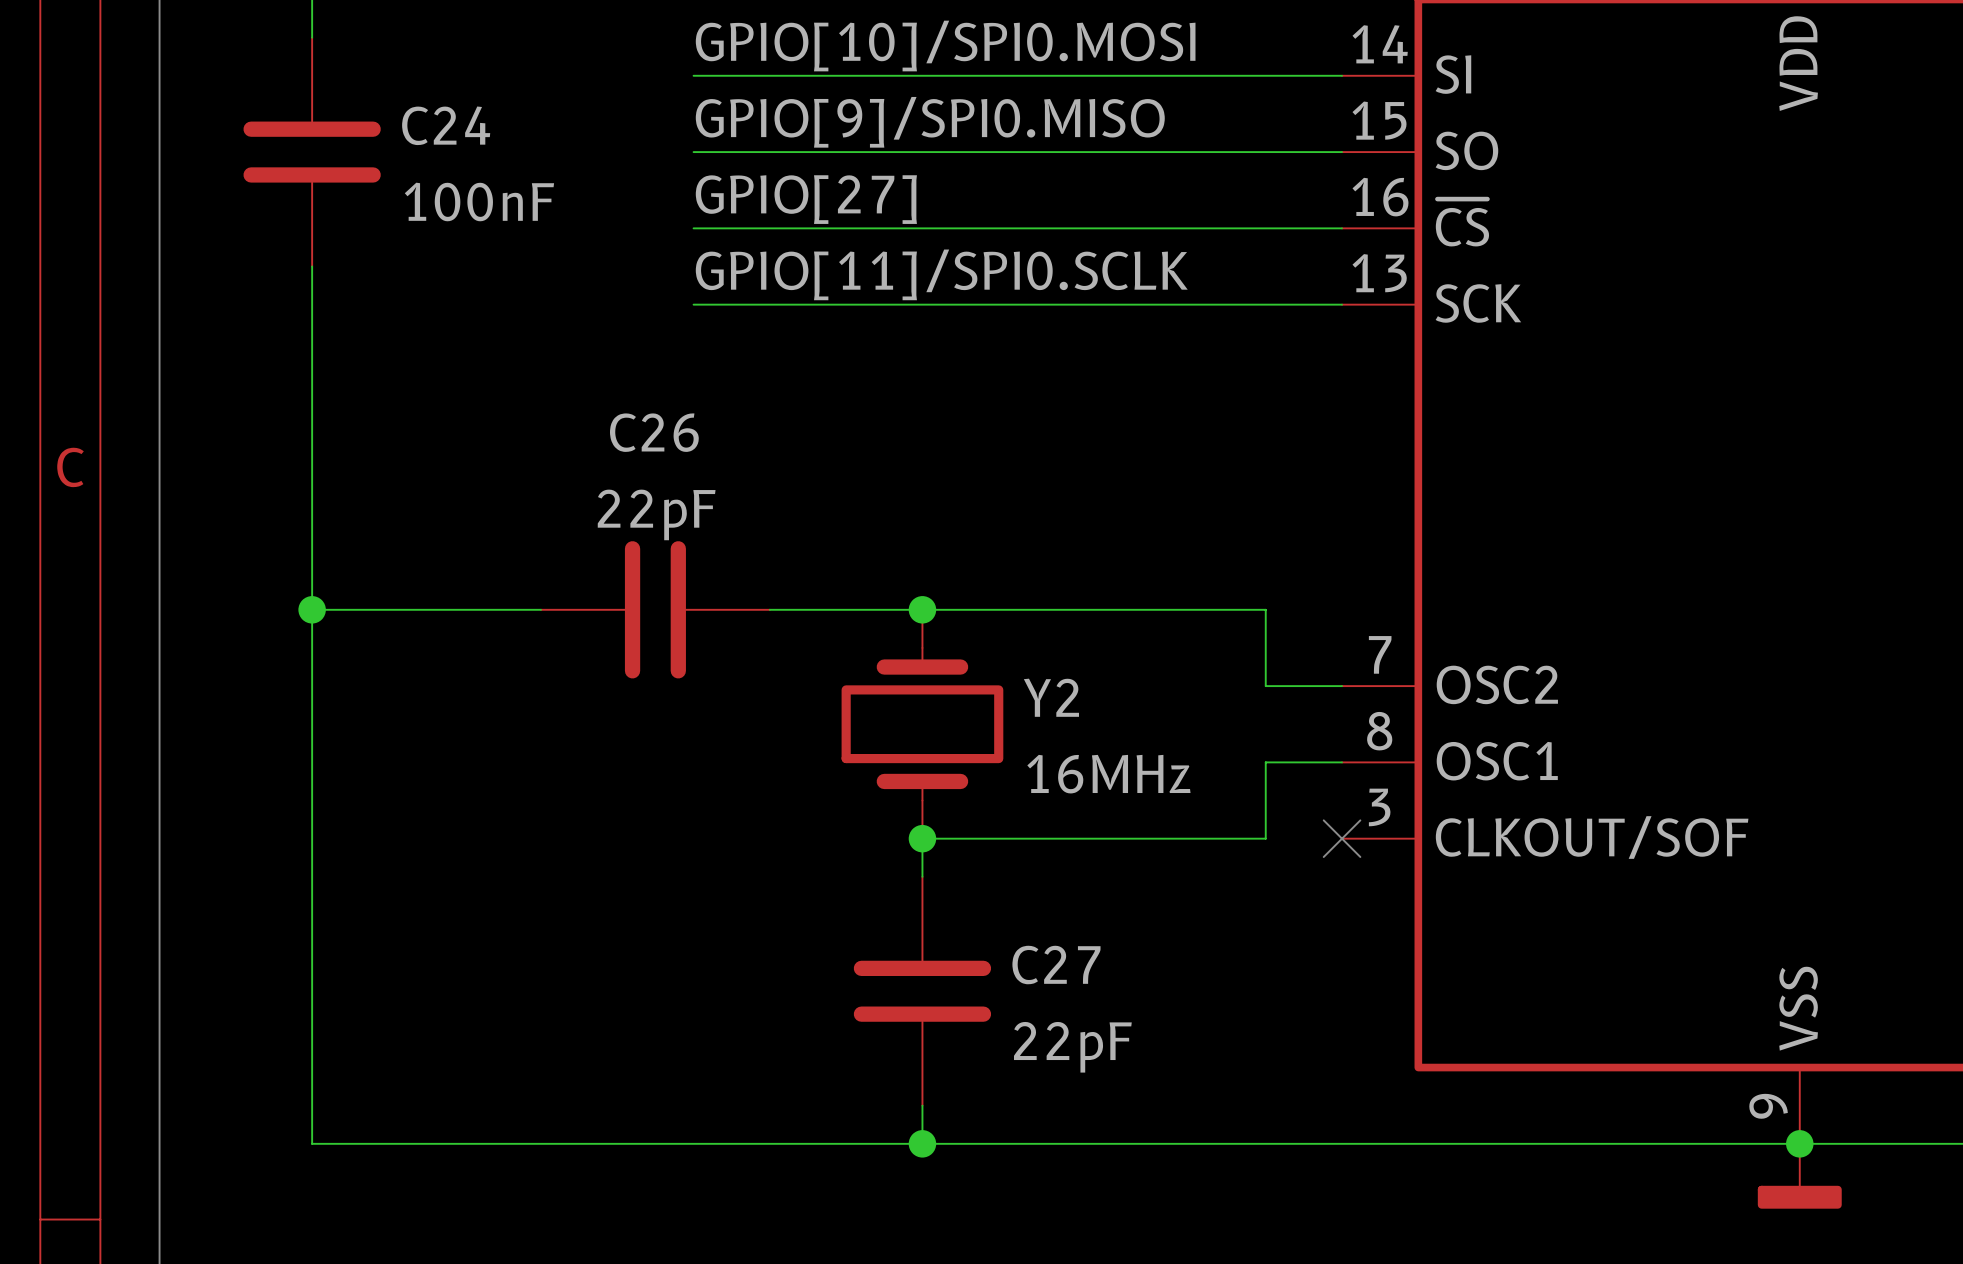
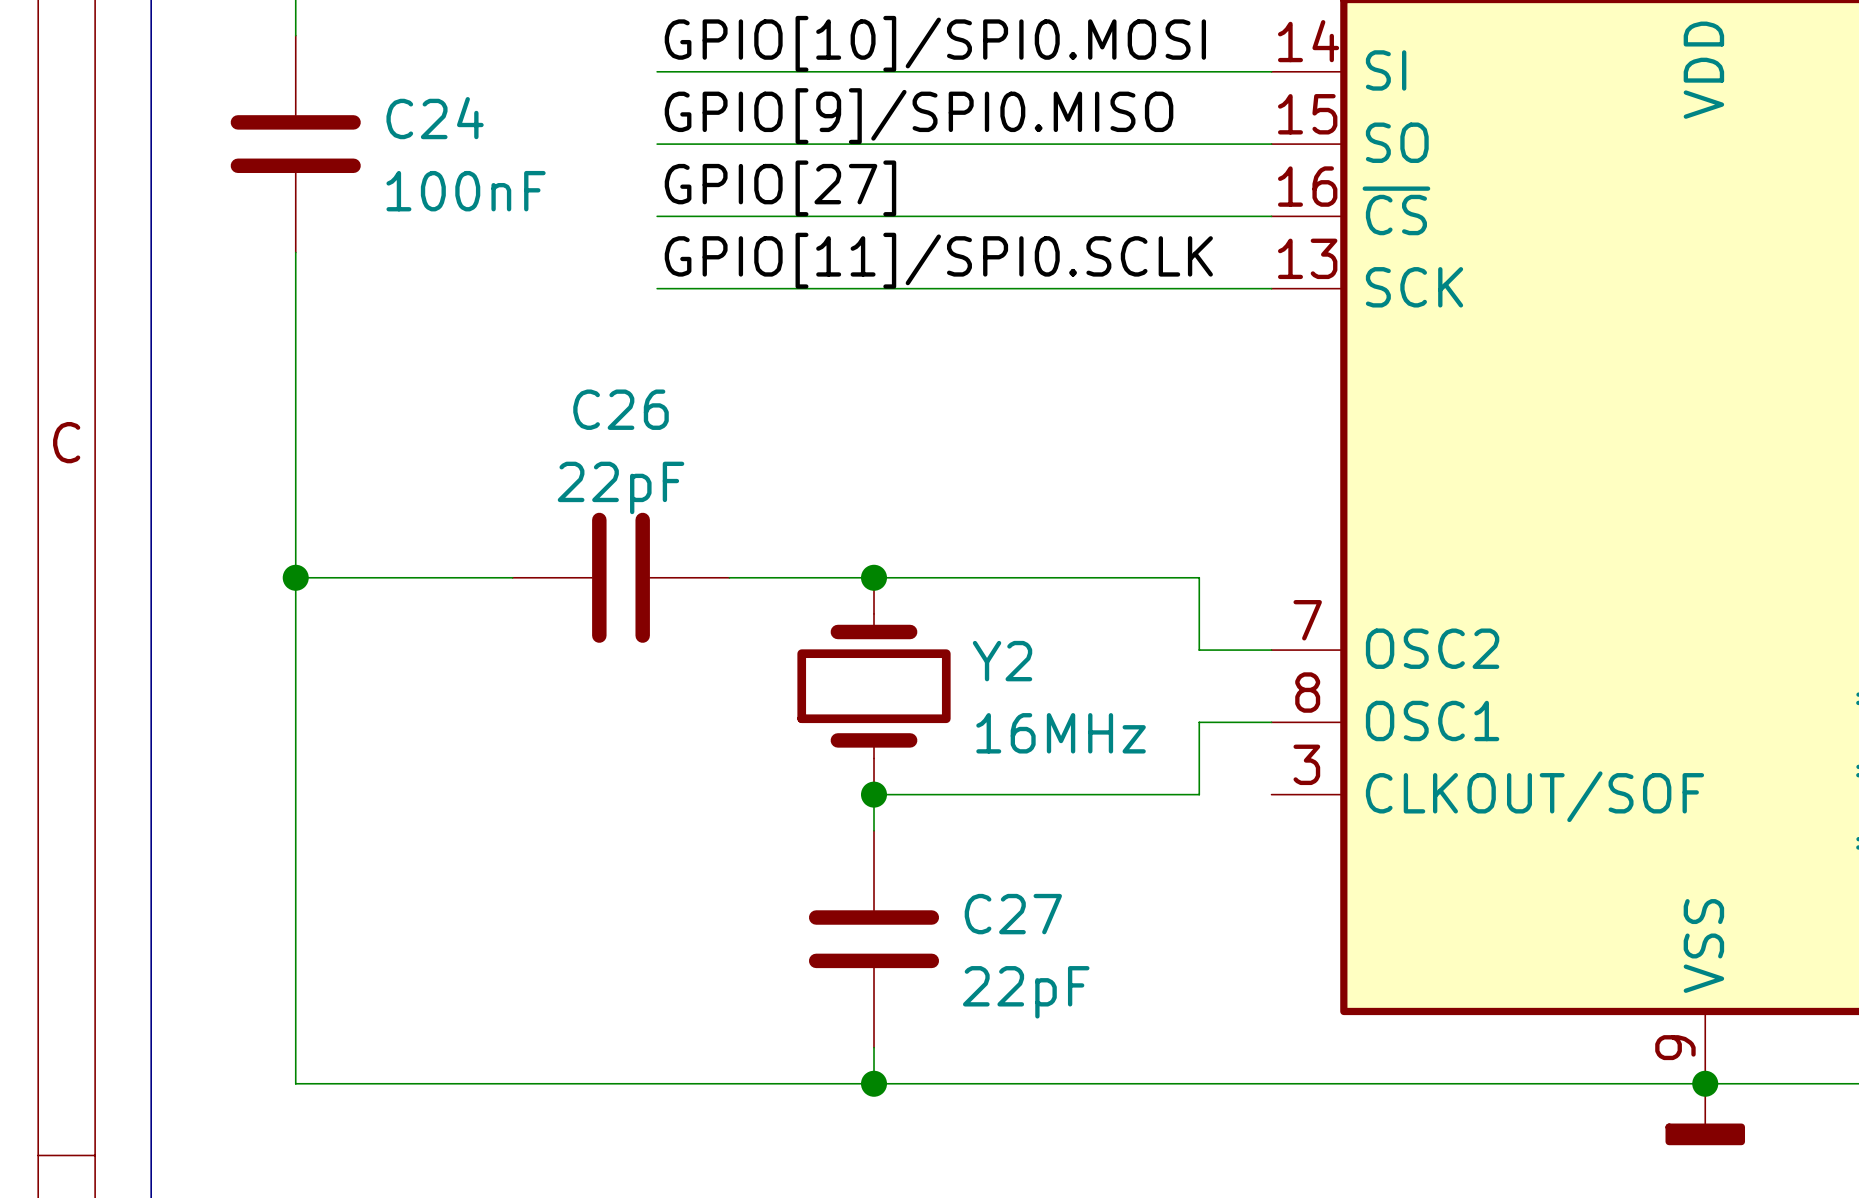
no-connect mark: (1342, 838) -> none

